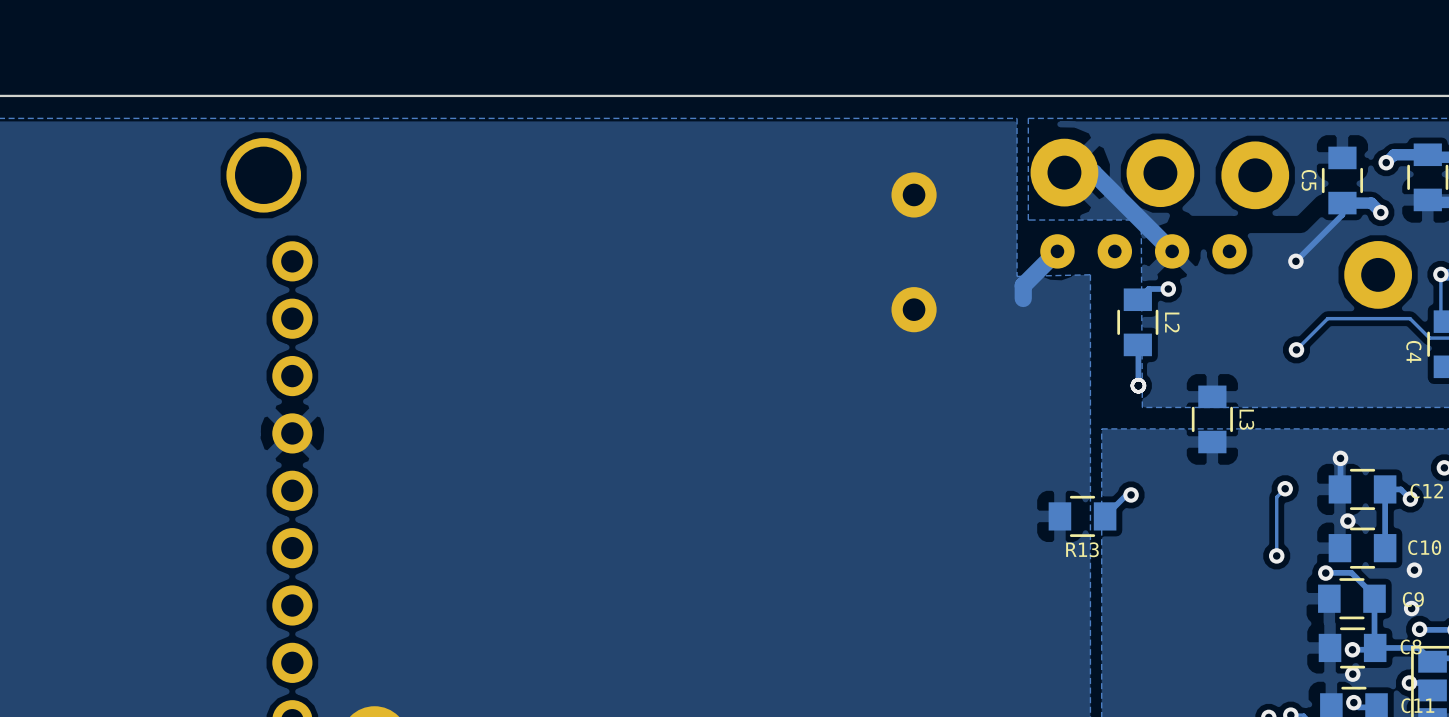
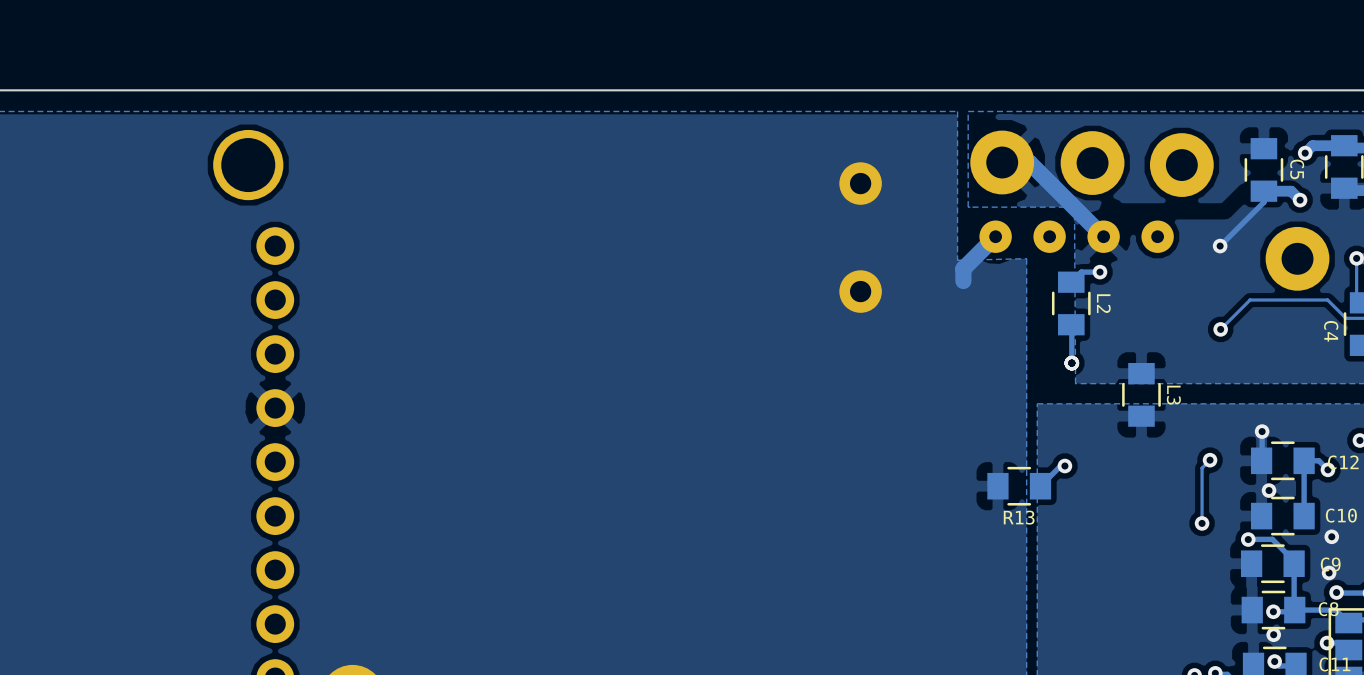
C5 name position: C5 (1309, 180) -> C5 (1297, 169)

